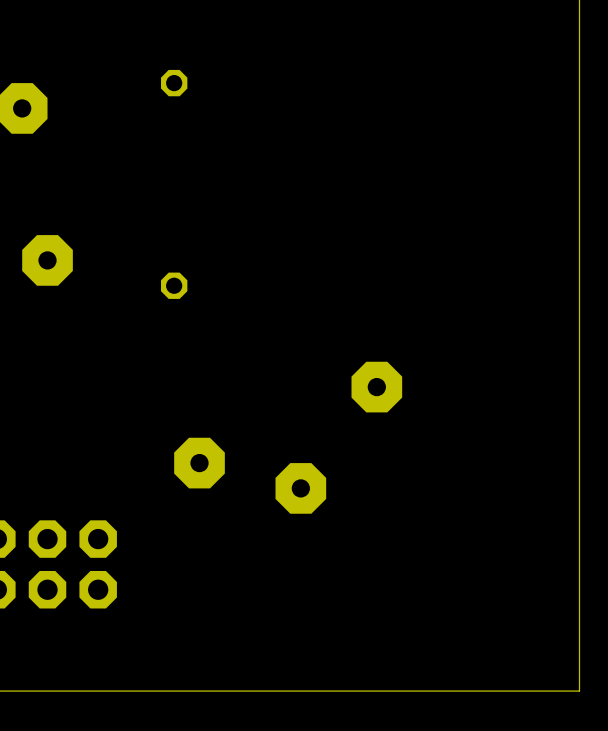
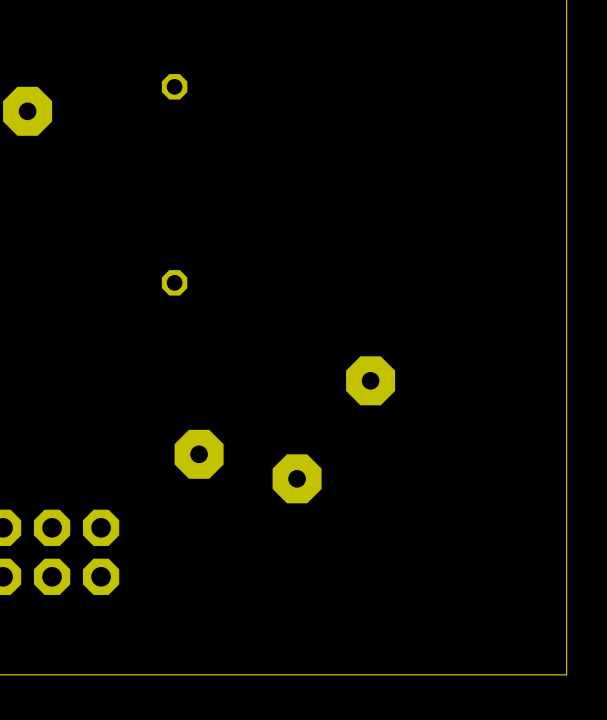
part: (47, 260) -> none

